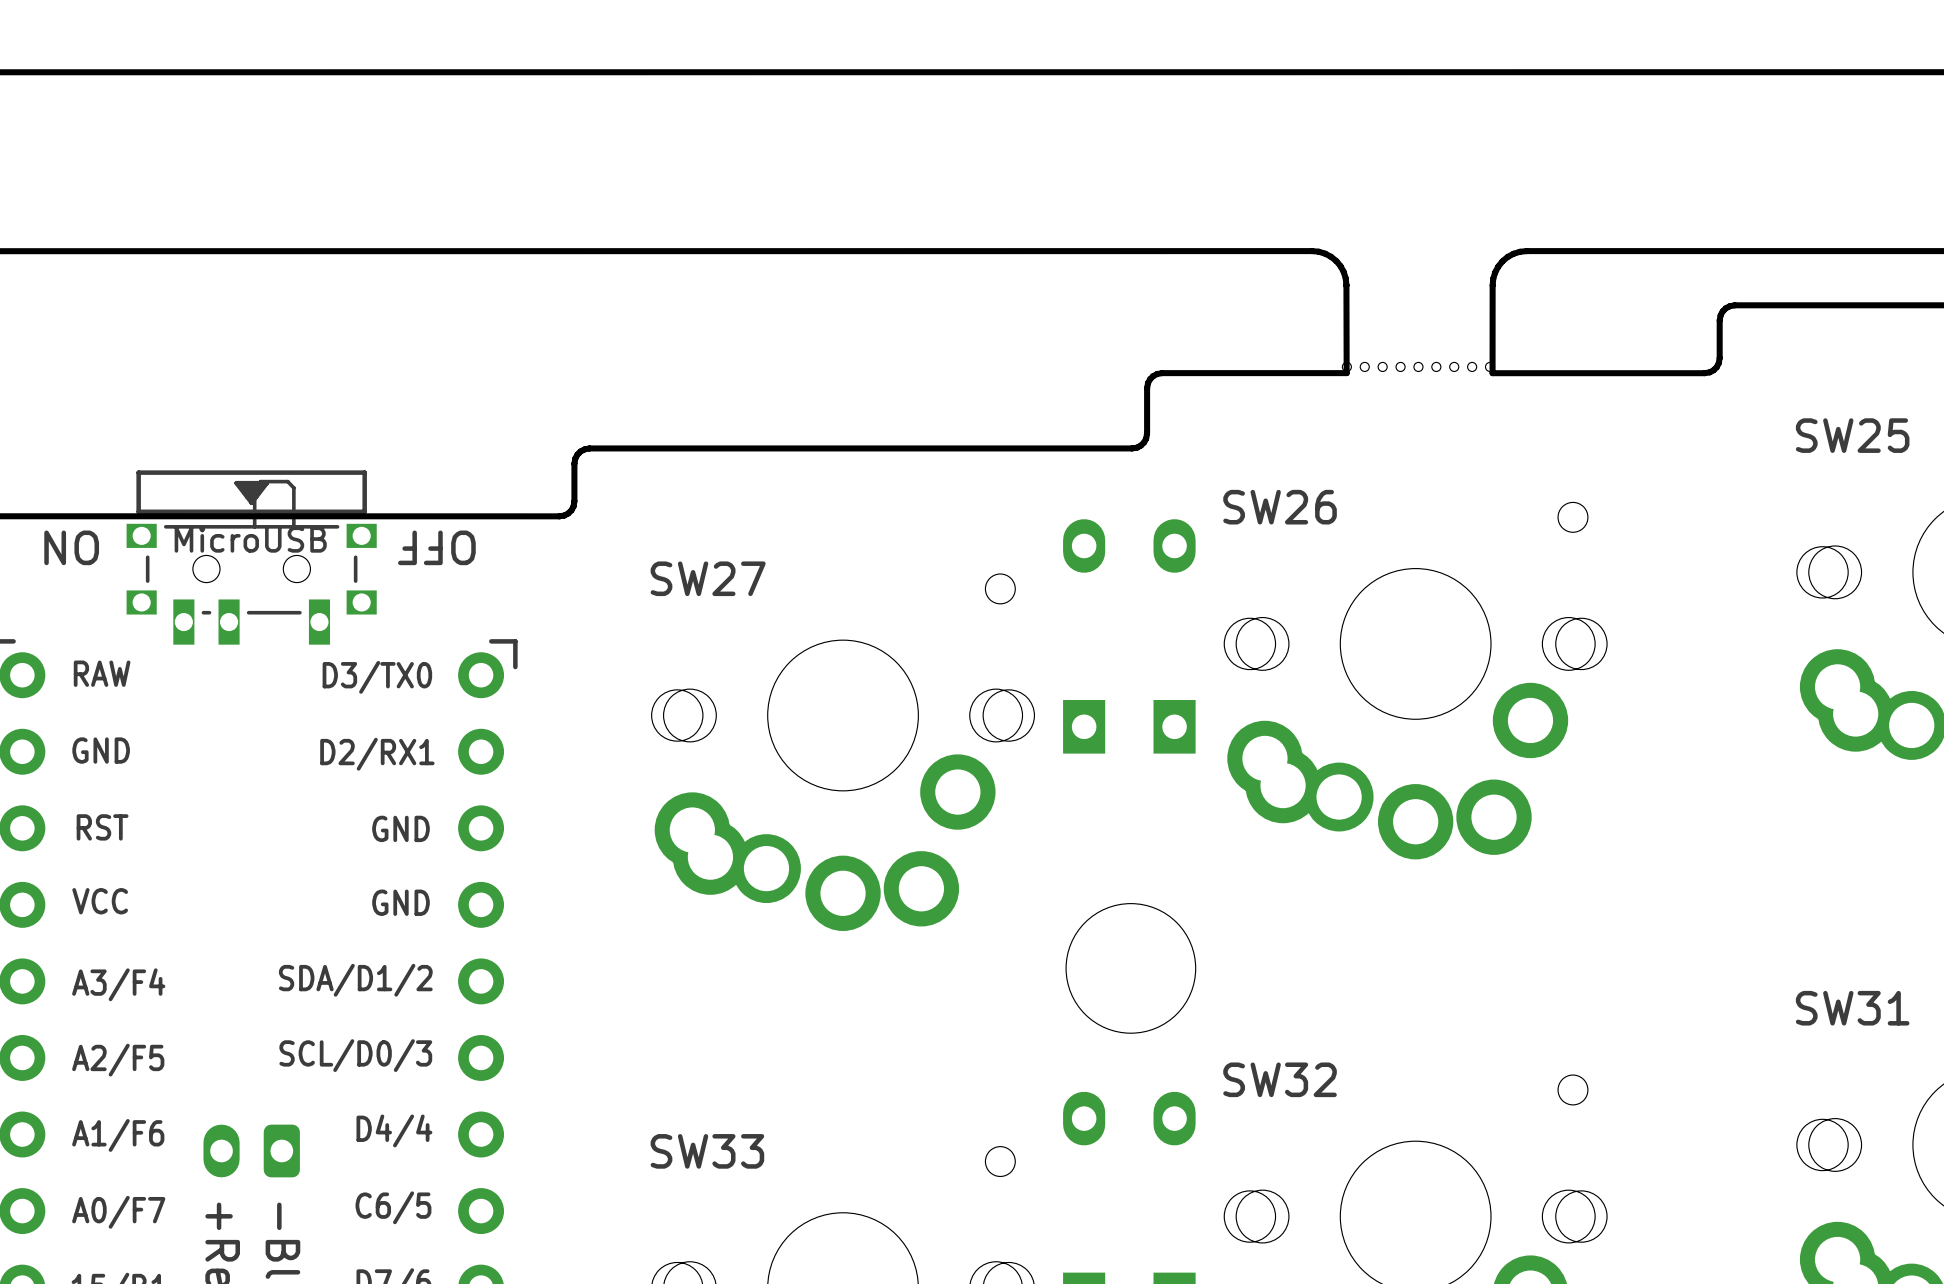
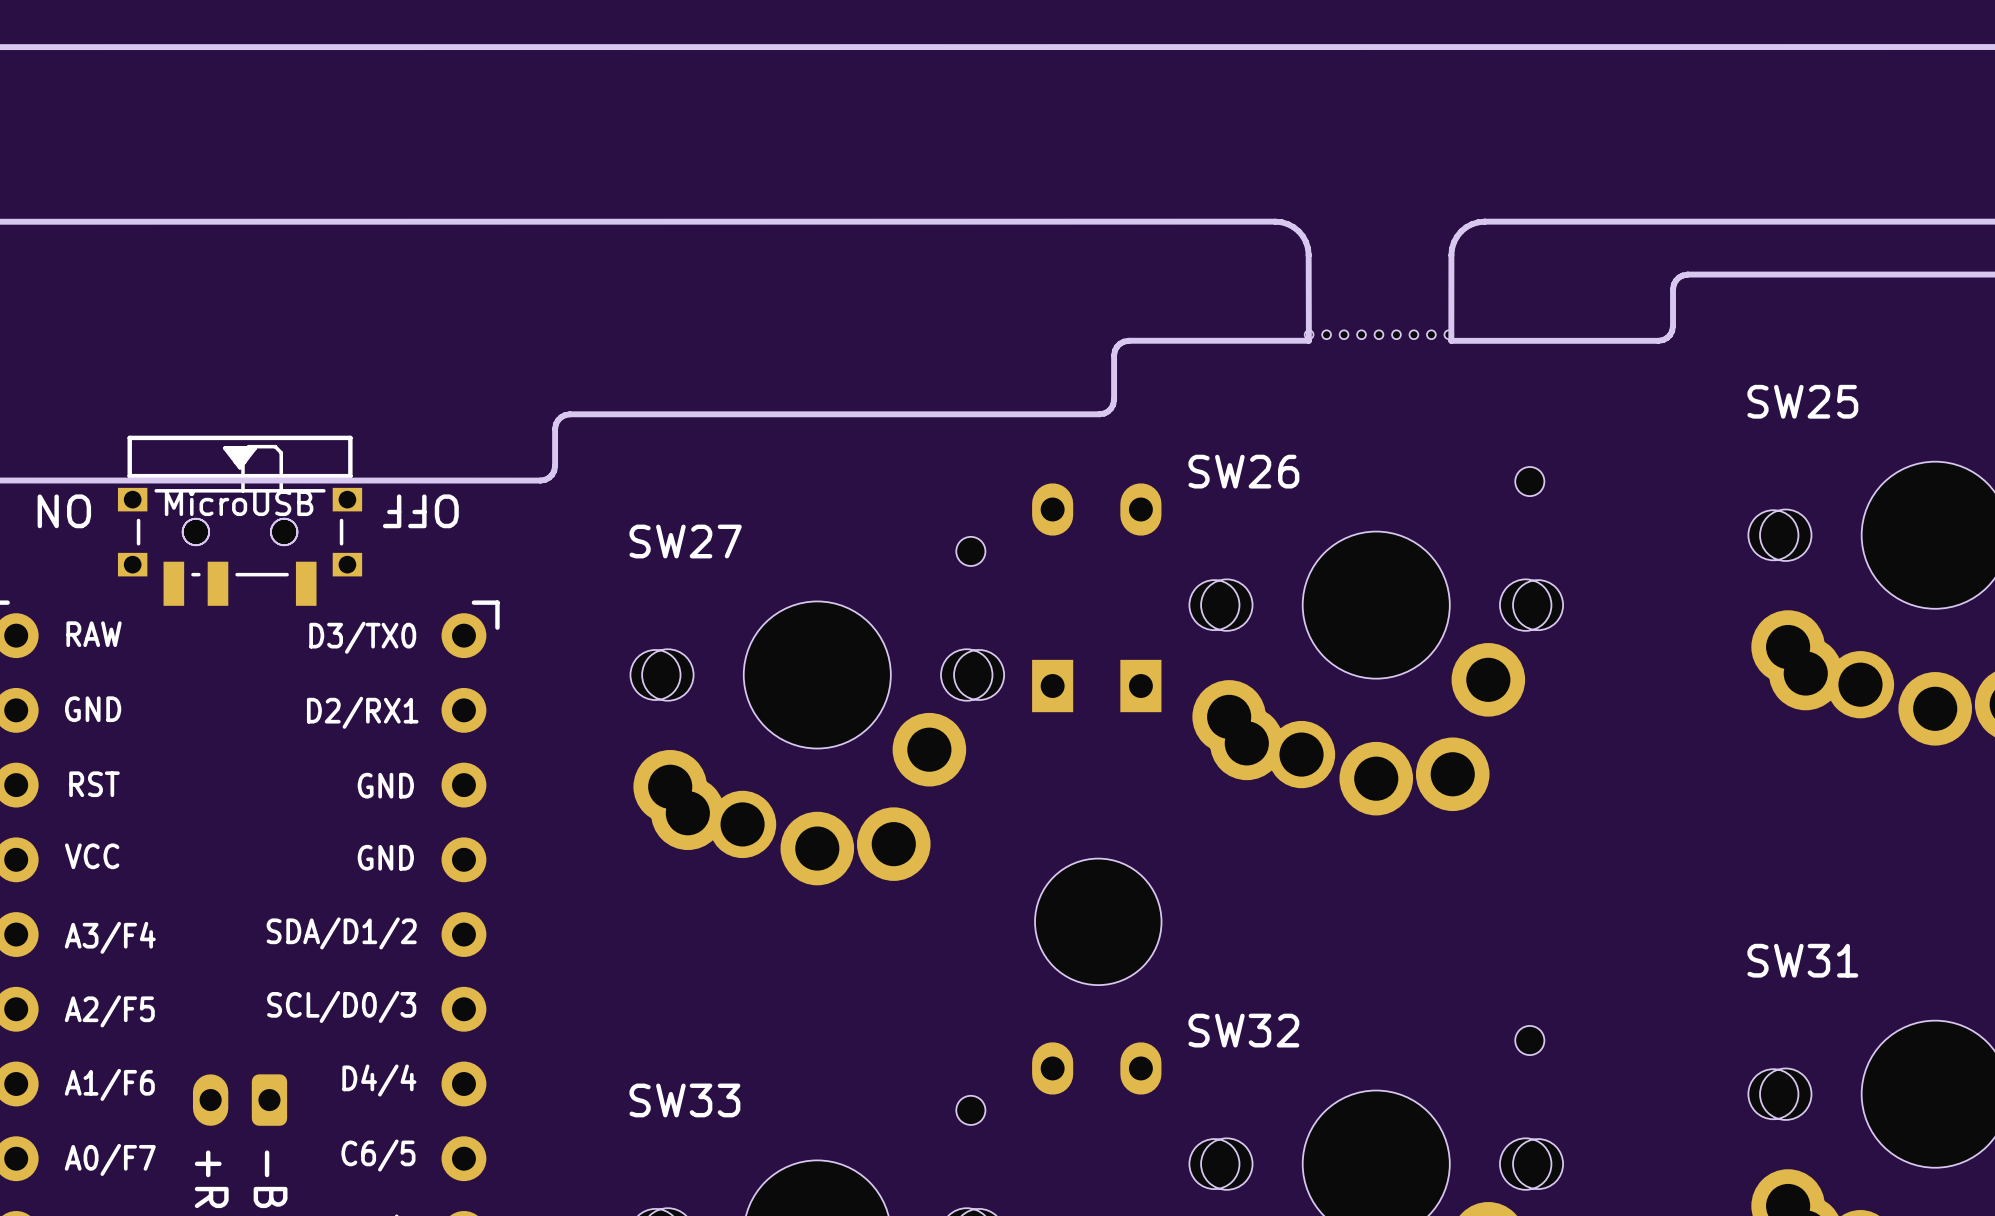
part footprint: [126, 479, 377, 645] -> [117, 444, 363, 606]
part: none -> (240, 531)

